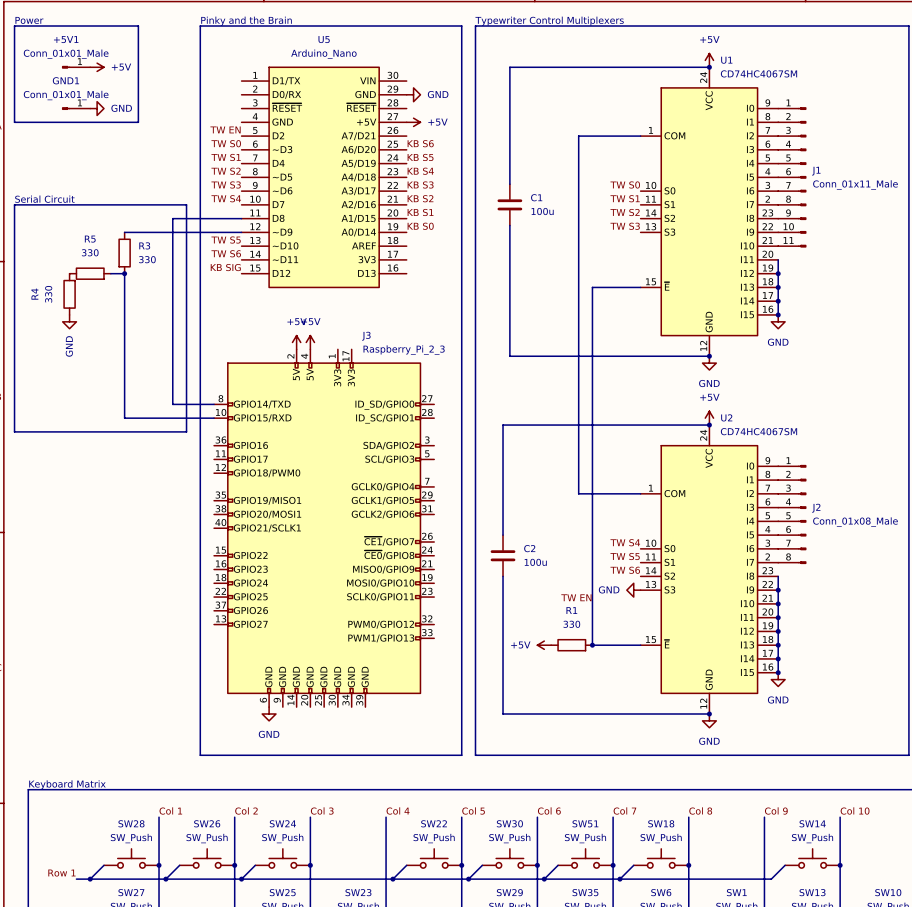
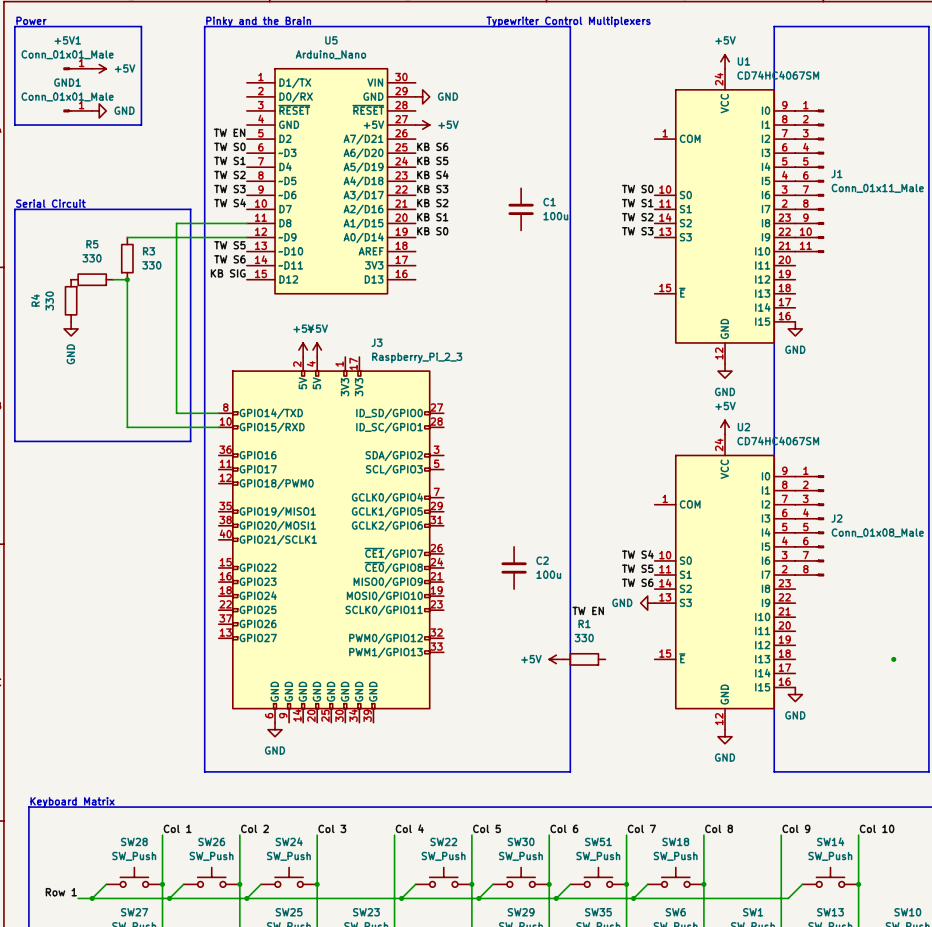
line: (461, 26) (461, 755) -> (471, 26) (485, 26)
line: (475, 26) (475, 755) -> (471, 771) (485, 771)
line: (558, 26) (757, 26) -> (570, 26) (570, 771)
wire: (709, 67) (509, 67) (509, 184) -> none
junction: (709, 67) -> none
wire: (640, 136) (578, 136) (578, 493) (640, 493) -> none
wire: (509, 225) (509, 356) (709, 356) -> none
wire: (778, 259) (778, 314) -> none
junction: (778, 273) -> none
wire: (640, 287) (592, 287) (592, 645) (640, 645) -> none
junction: (778, 287) -> none
junction: (778, 301) -> none
junction: (778, 314) -> none
junction: (709, 356) -> none
wire: (709, 425) (503, 425) (503, 535) -> none
junction: (709, 425) -> none
wire: (503, 576) (503, 714) (709, 714) -> none
wire: (778, 576) (778, 672) -> none
junction: (778, 590) -> none
junction: (778, 603) -> none
junction: (778, 617) -> none
junction: (778, 631) -> none
junction: (592, 645) -> none
junction: (778, 645) -> none
junction: none -> (893, 659)
junction: (778, 658) -> none
junction: (778, 672) -> none
junction: (709, 714) -> none
line: (558, 755) (757, 755) -> (774, 26) (774, 771)

